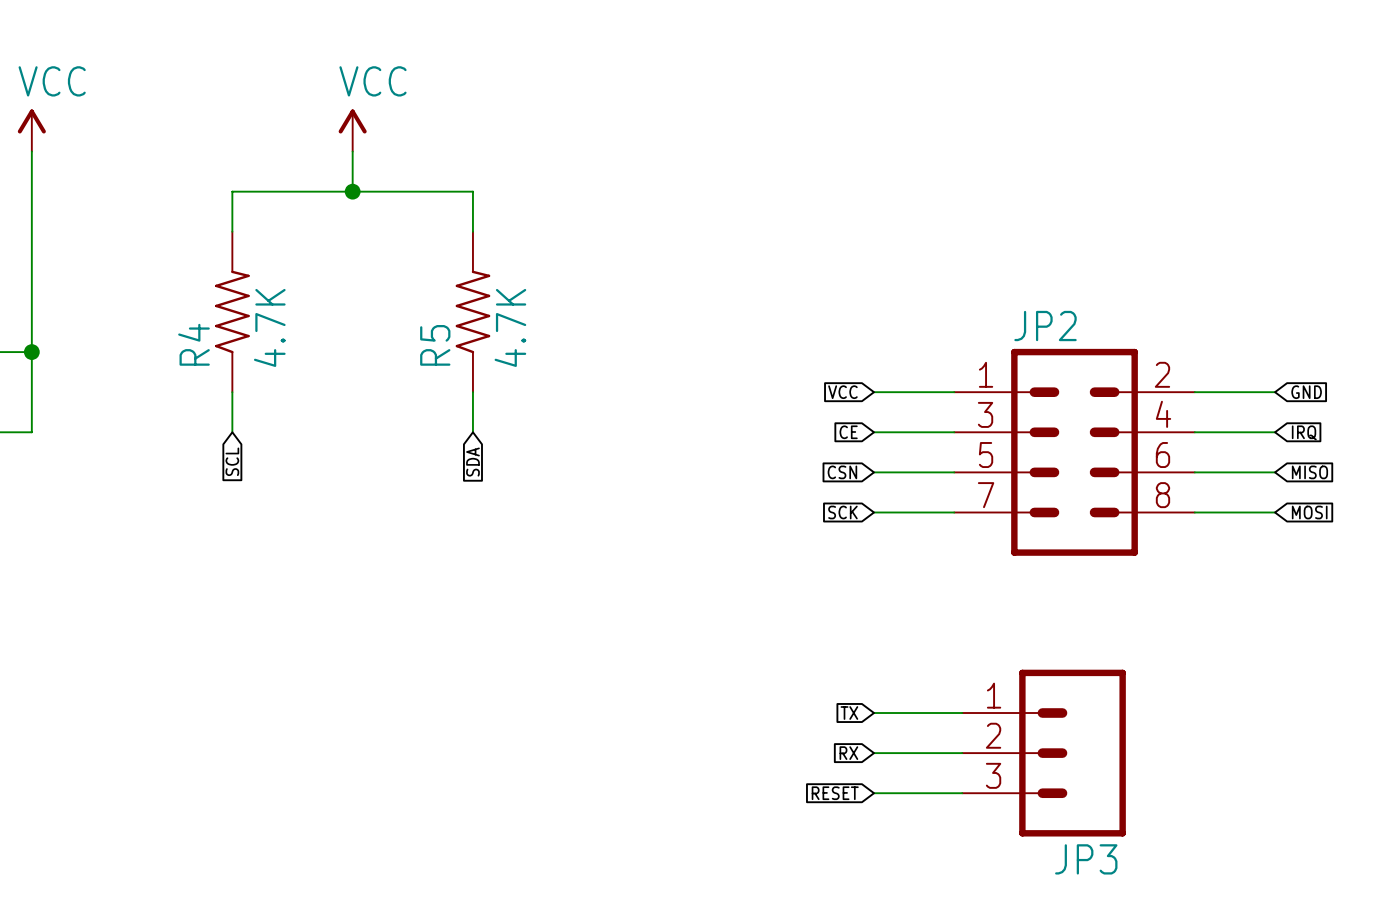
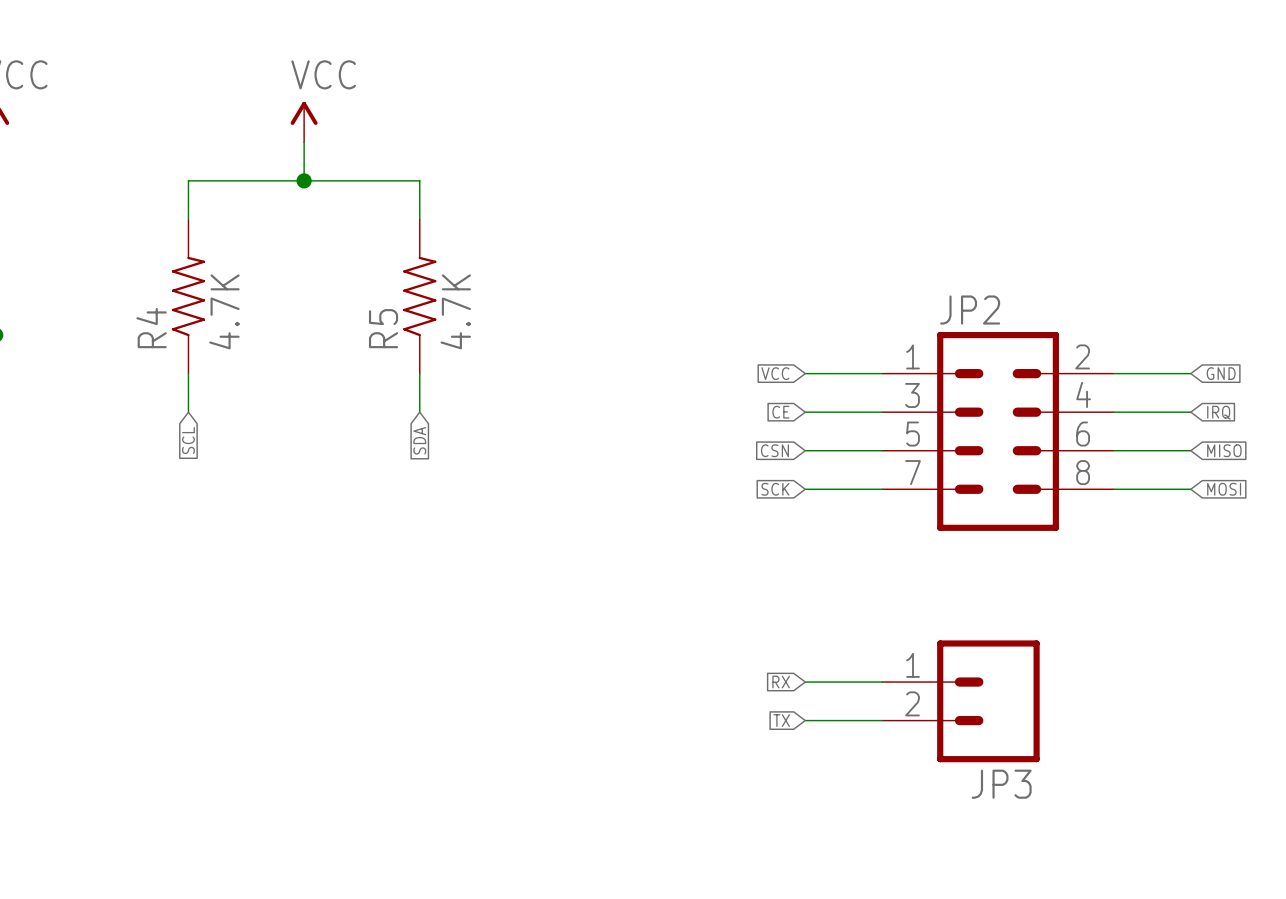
JP3 symbol: [962, 669, 1126, 837] -> [882, 640, 1040, 763]
global label: TX (849, 713) -> RX (781, 682)
global label: RX (848, 753) -> TX (781, 720)
global label: RESET (835, 793) -> none
wire: (874, 793) (962, 793) -> none

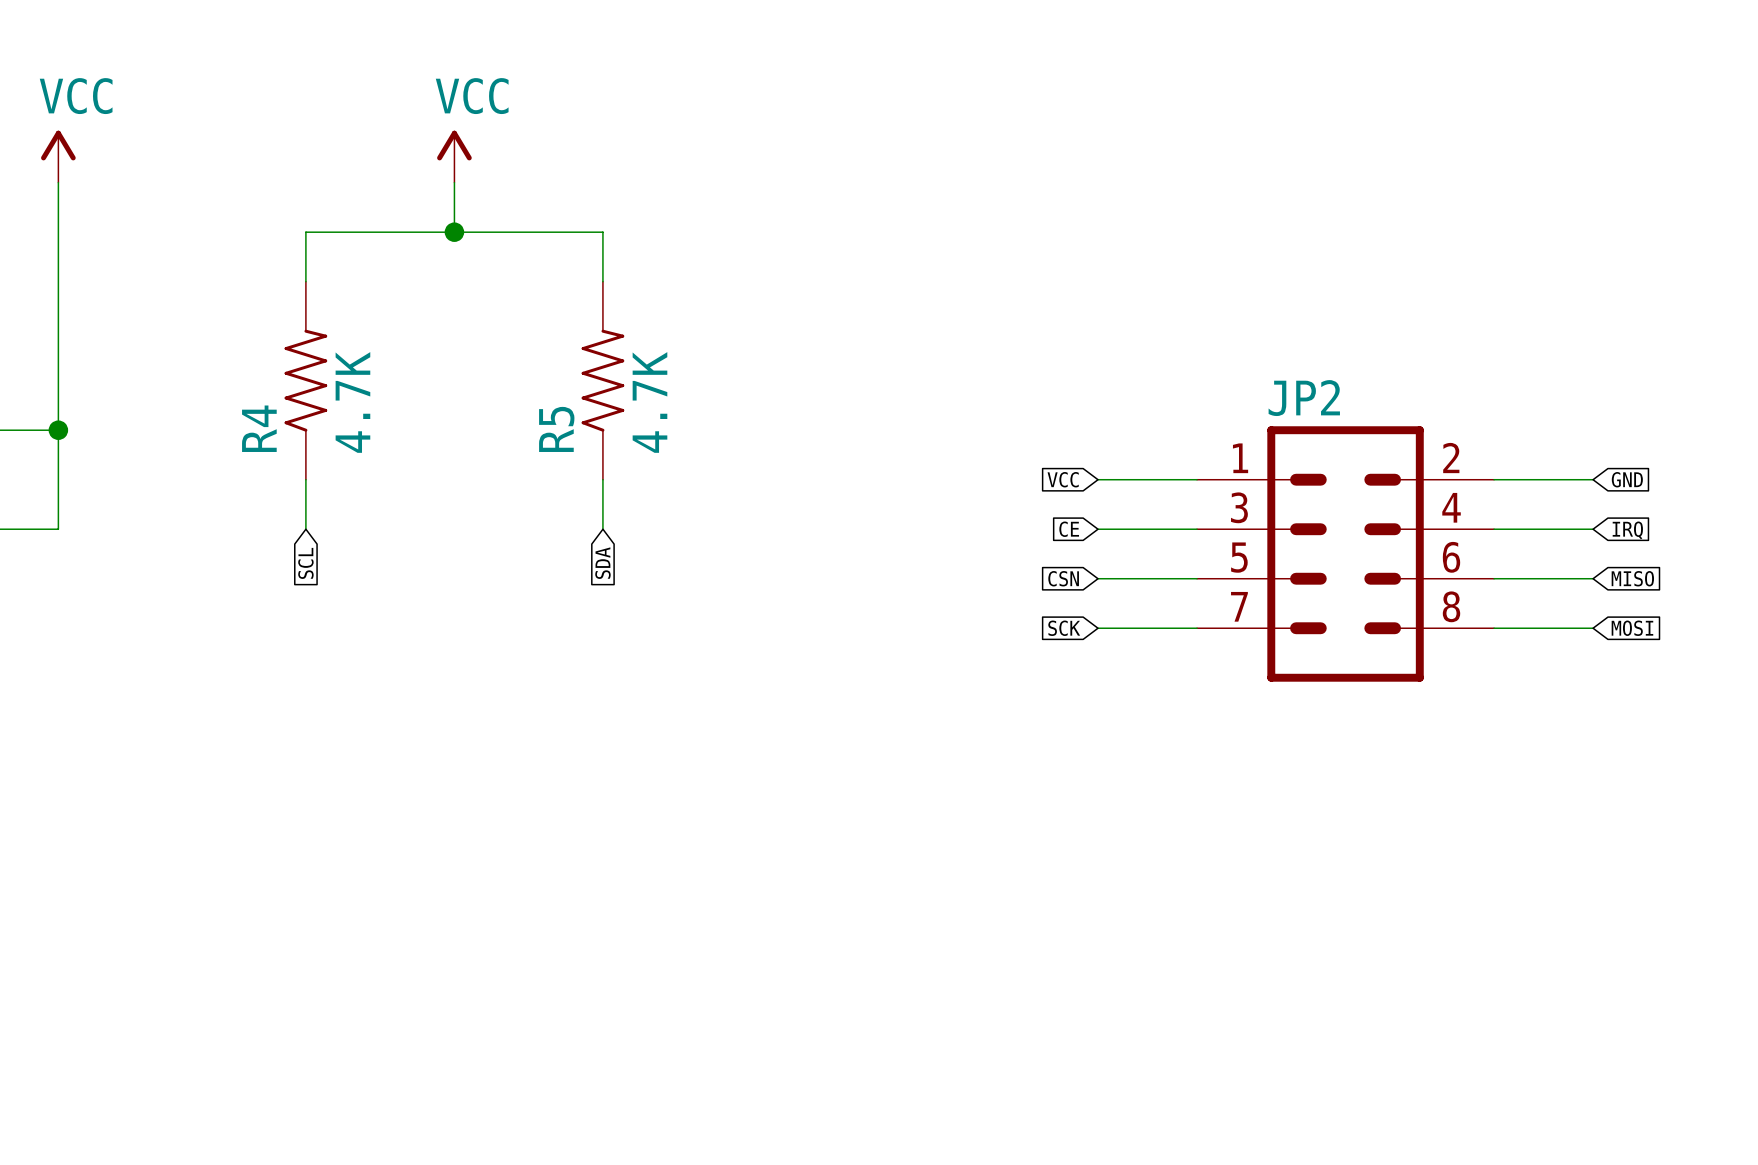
global label: RX (781, 682) -> none
wire: (805, 682) (882, 682) -> none
JP3: (961, 701) -> none
global label: TX (781, 720) -> none
wire: (805, 720) (882, 720) -> none

